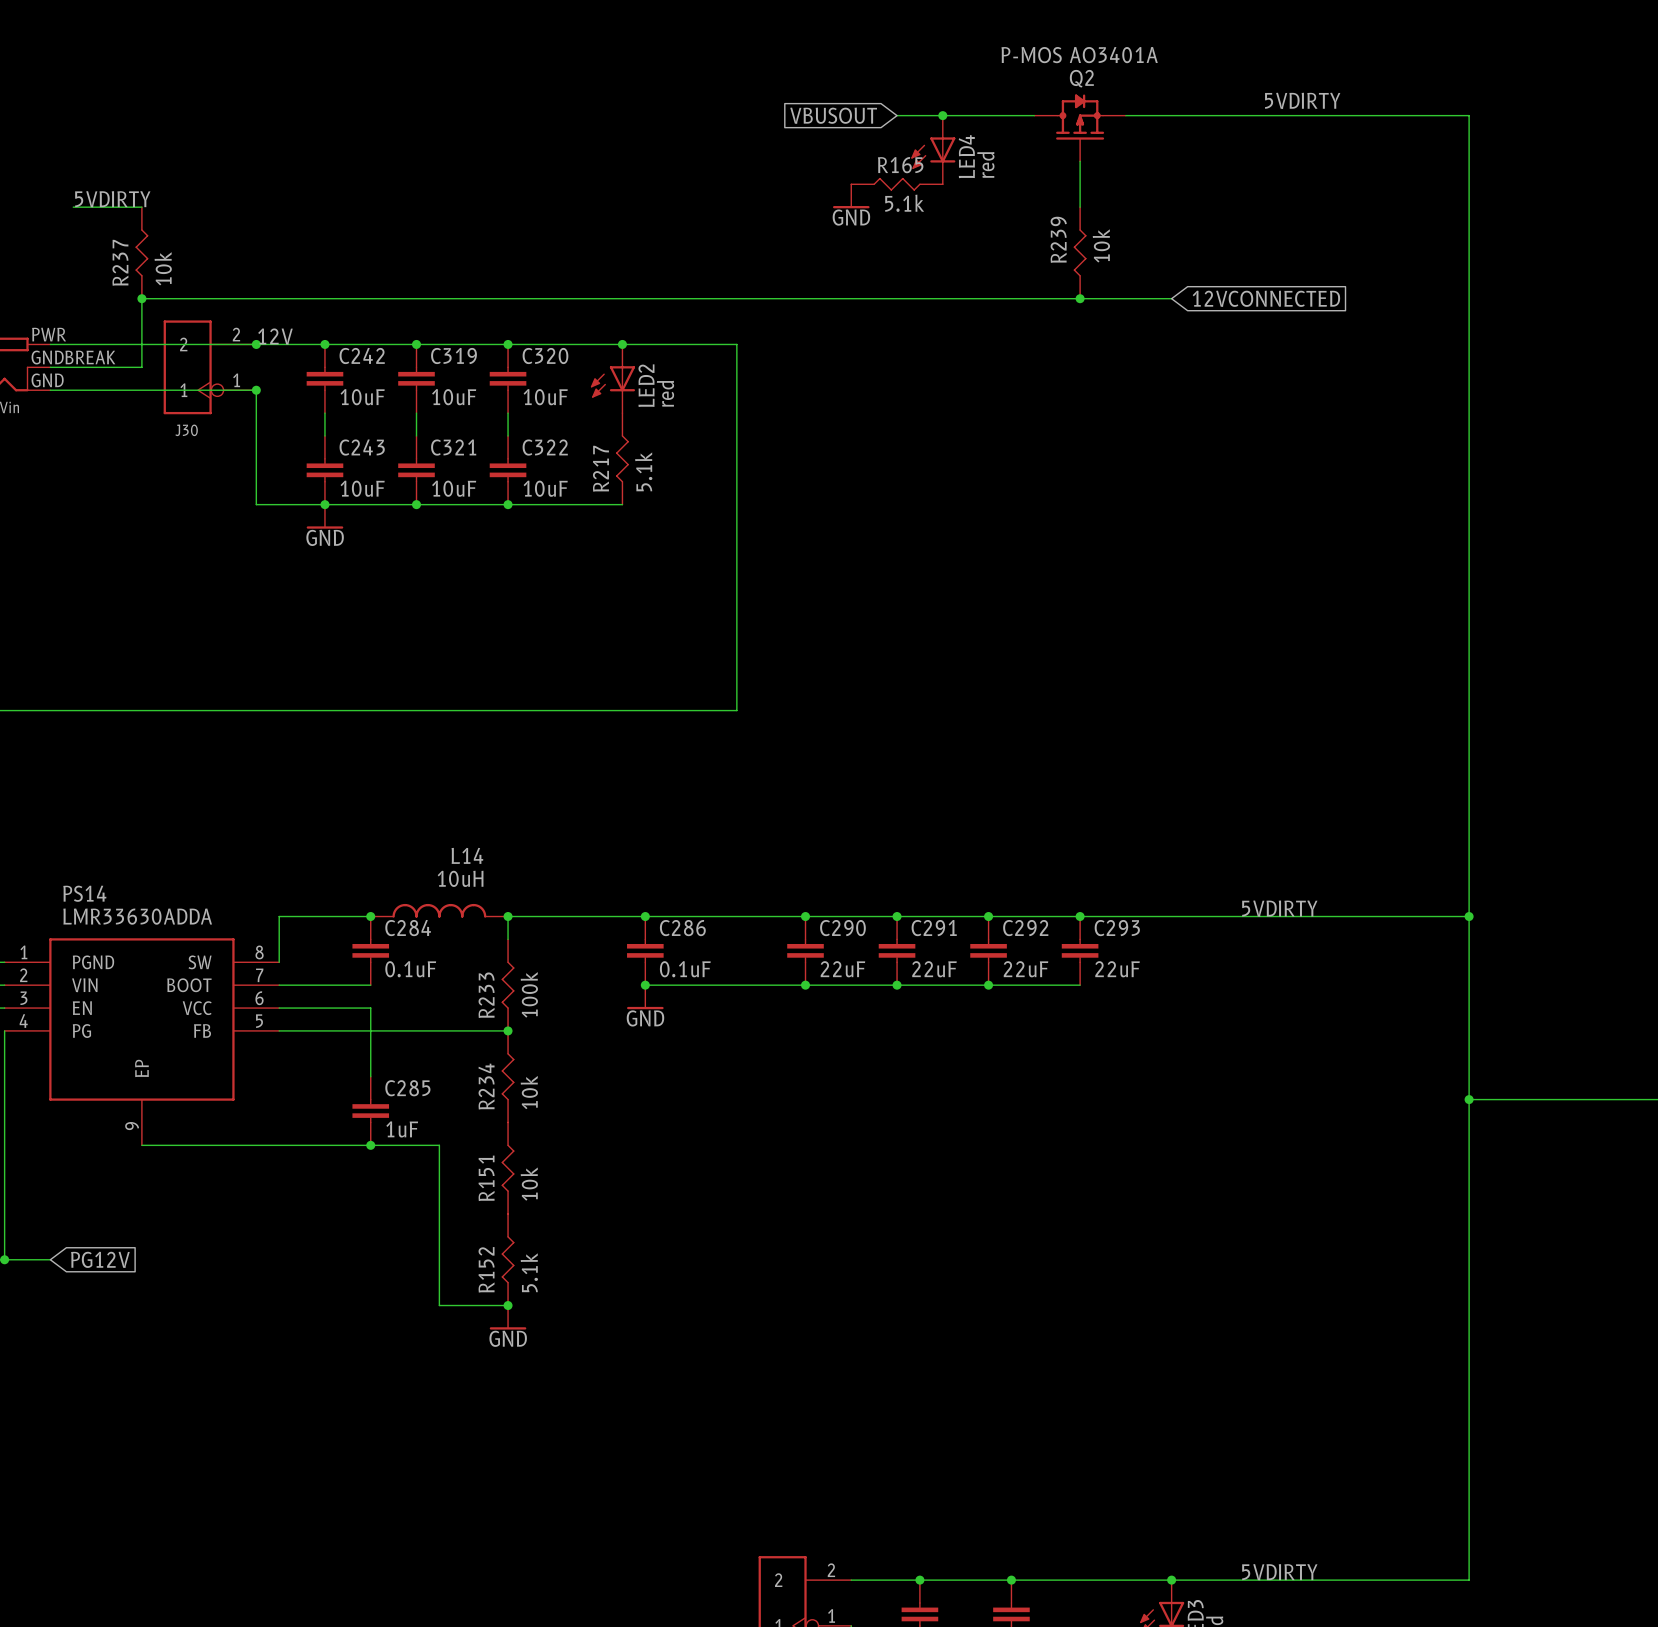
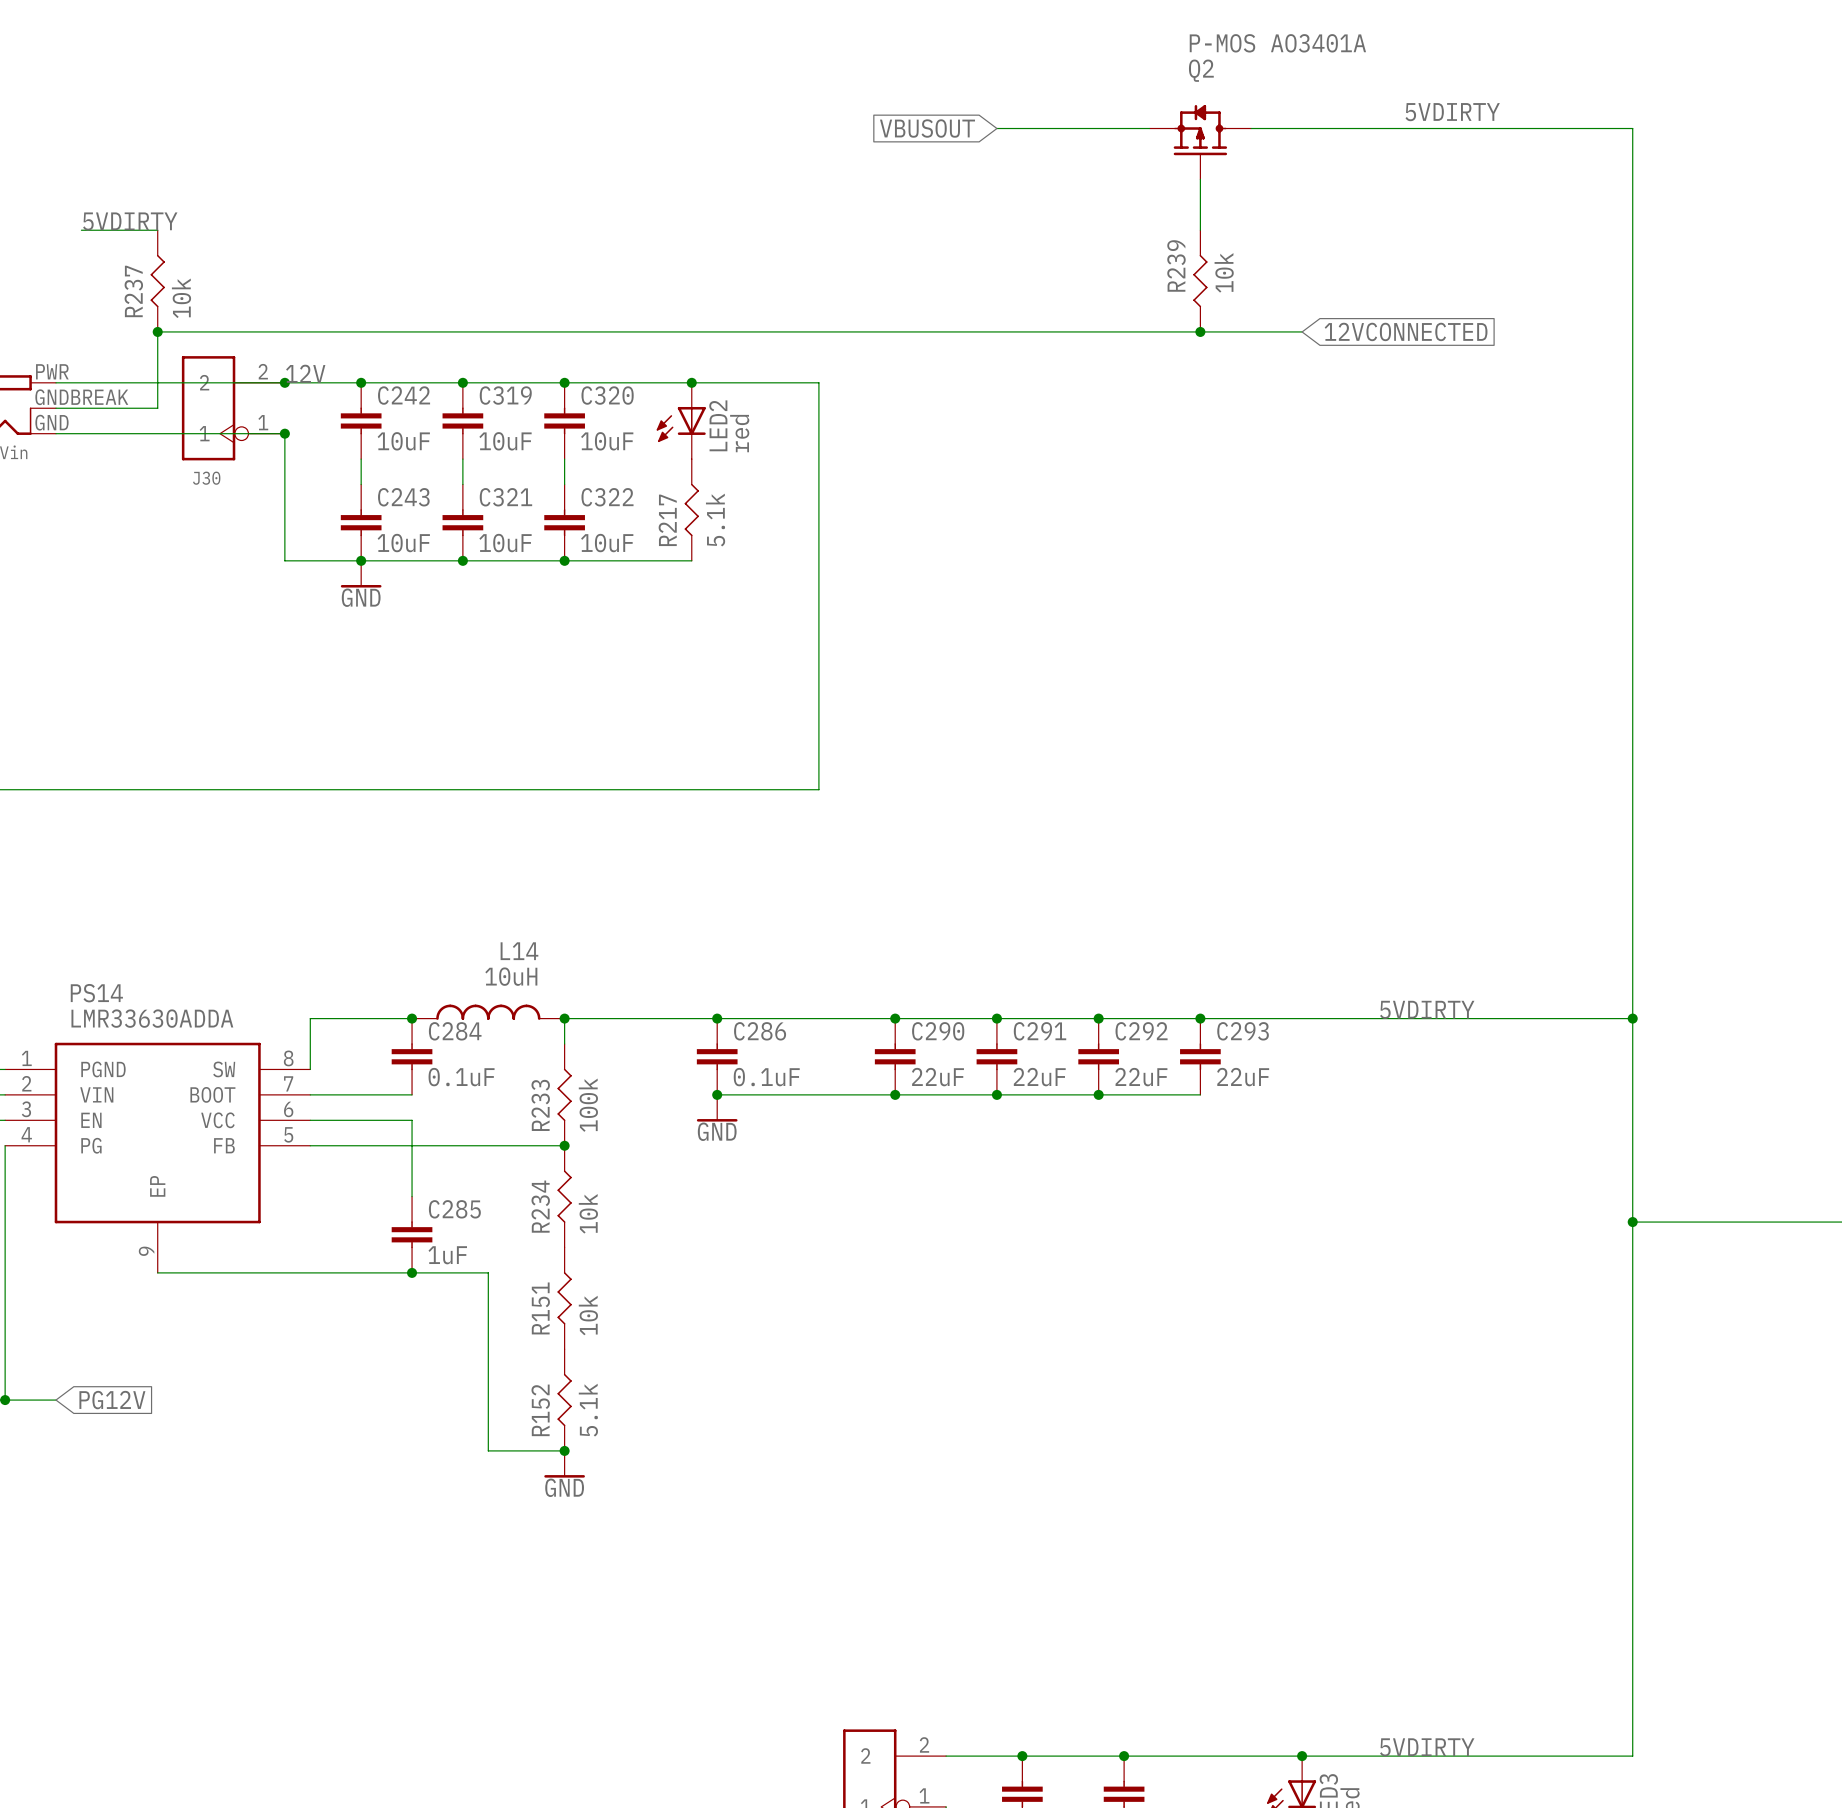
Q2 text position: P-MOS AO3401A (1079, 55) -> P-MOS AO3401A (1277, 43)
junction: (942, 115) -> none
Q2 flip: as is (1080, 117) -> left-right (1200, 130)
LED4: red (933, 149) -> none
R165: 5.1k (897, 184) -> none
power symbol: GND (851, 196) -> none

